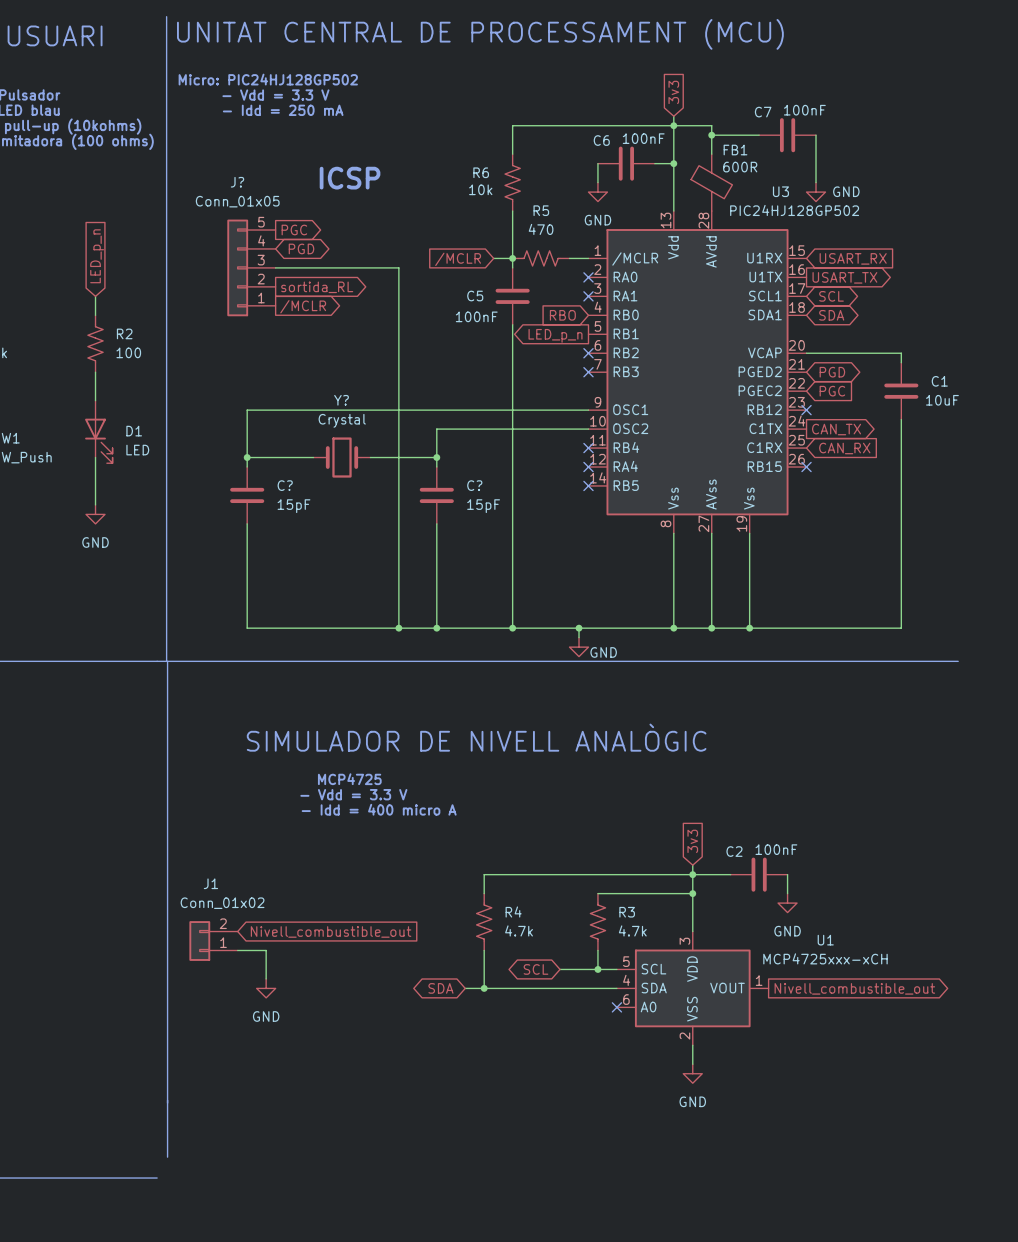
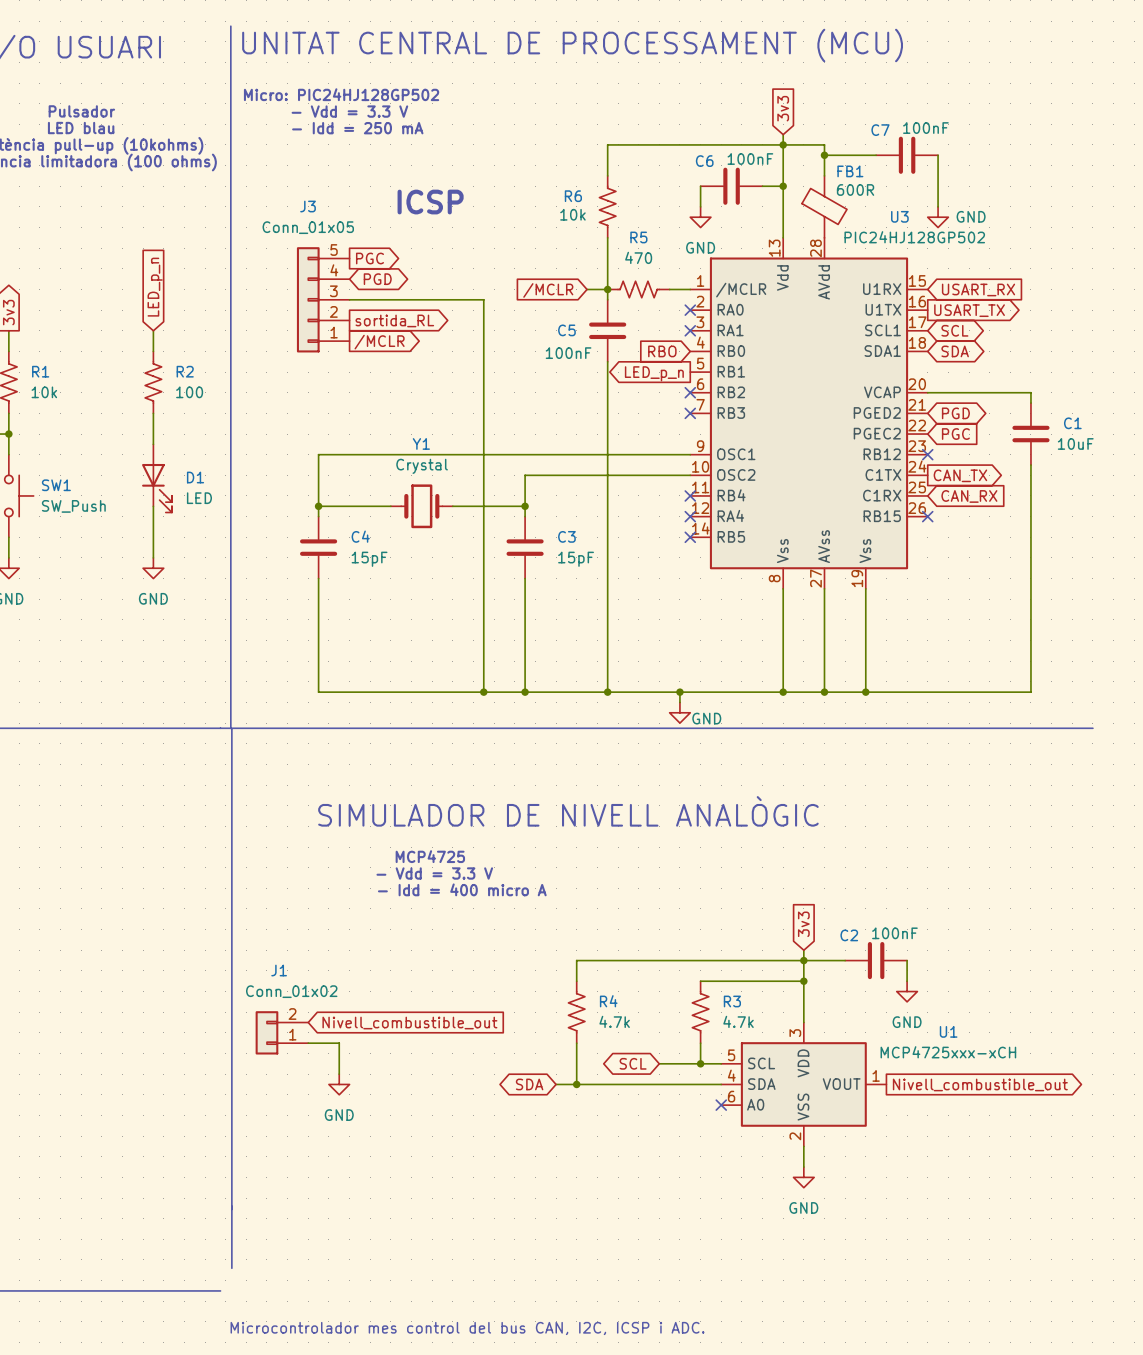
J? name: J? (237, 182) -> J3 (308, 206)
Y? name: Y? (341, 400) -> Y1 (421, 443)
C? name: C? (285, 485) -> C4 (360, 536)
C? name: C? (474, 485) -> C3 (566, 536)
text: none -> Microcontrolador mes control del bus CAN, I2C, ICSP i ADC. (467, 1328)

